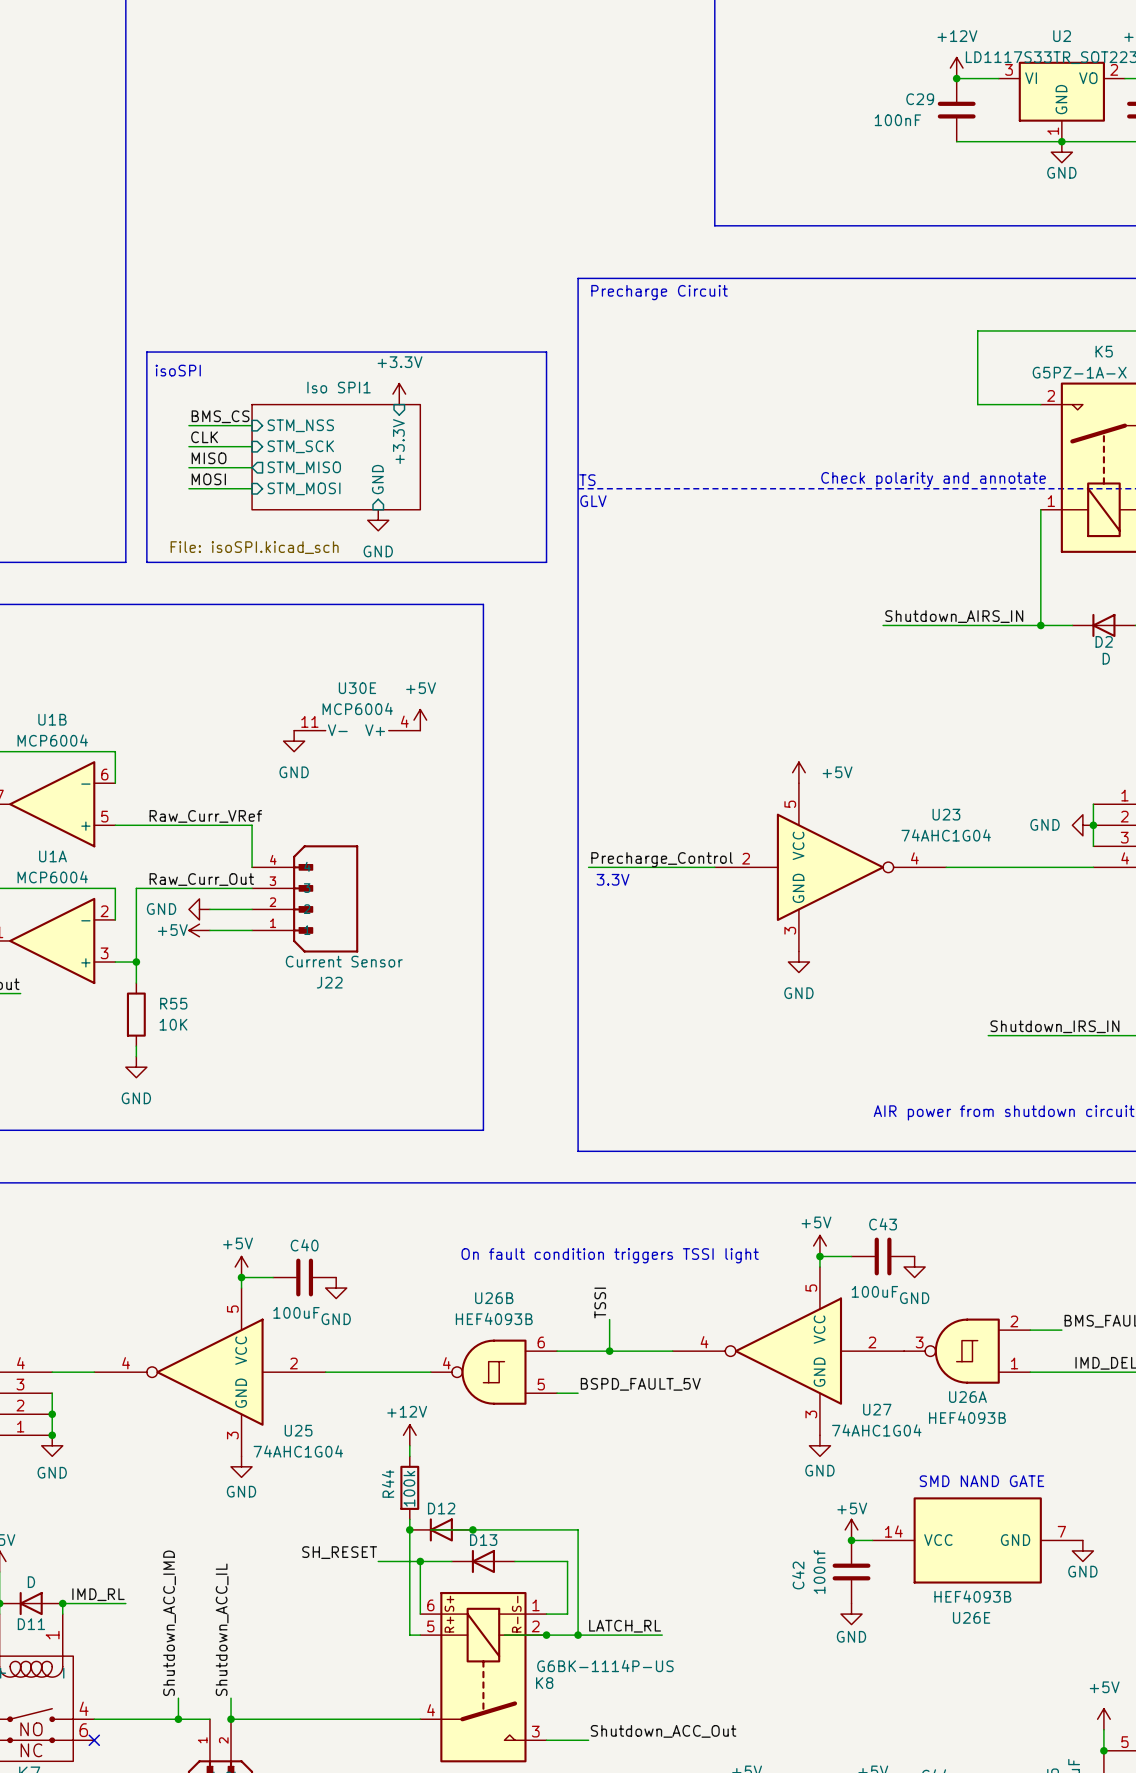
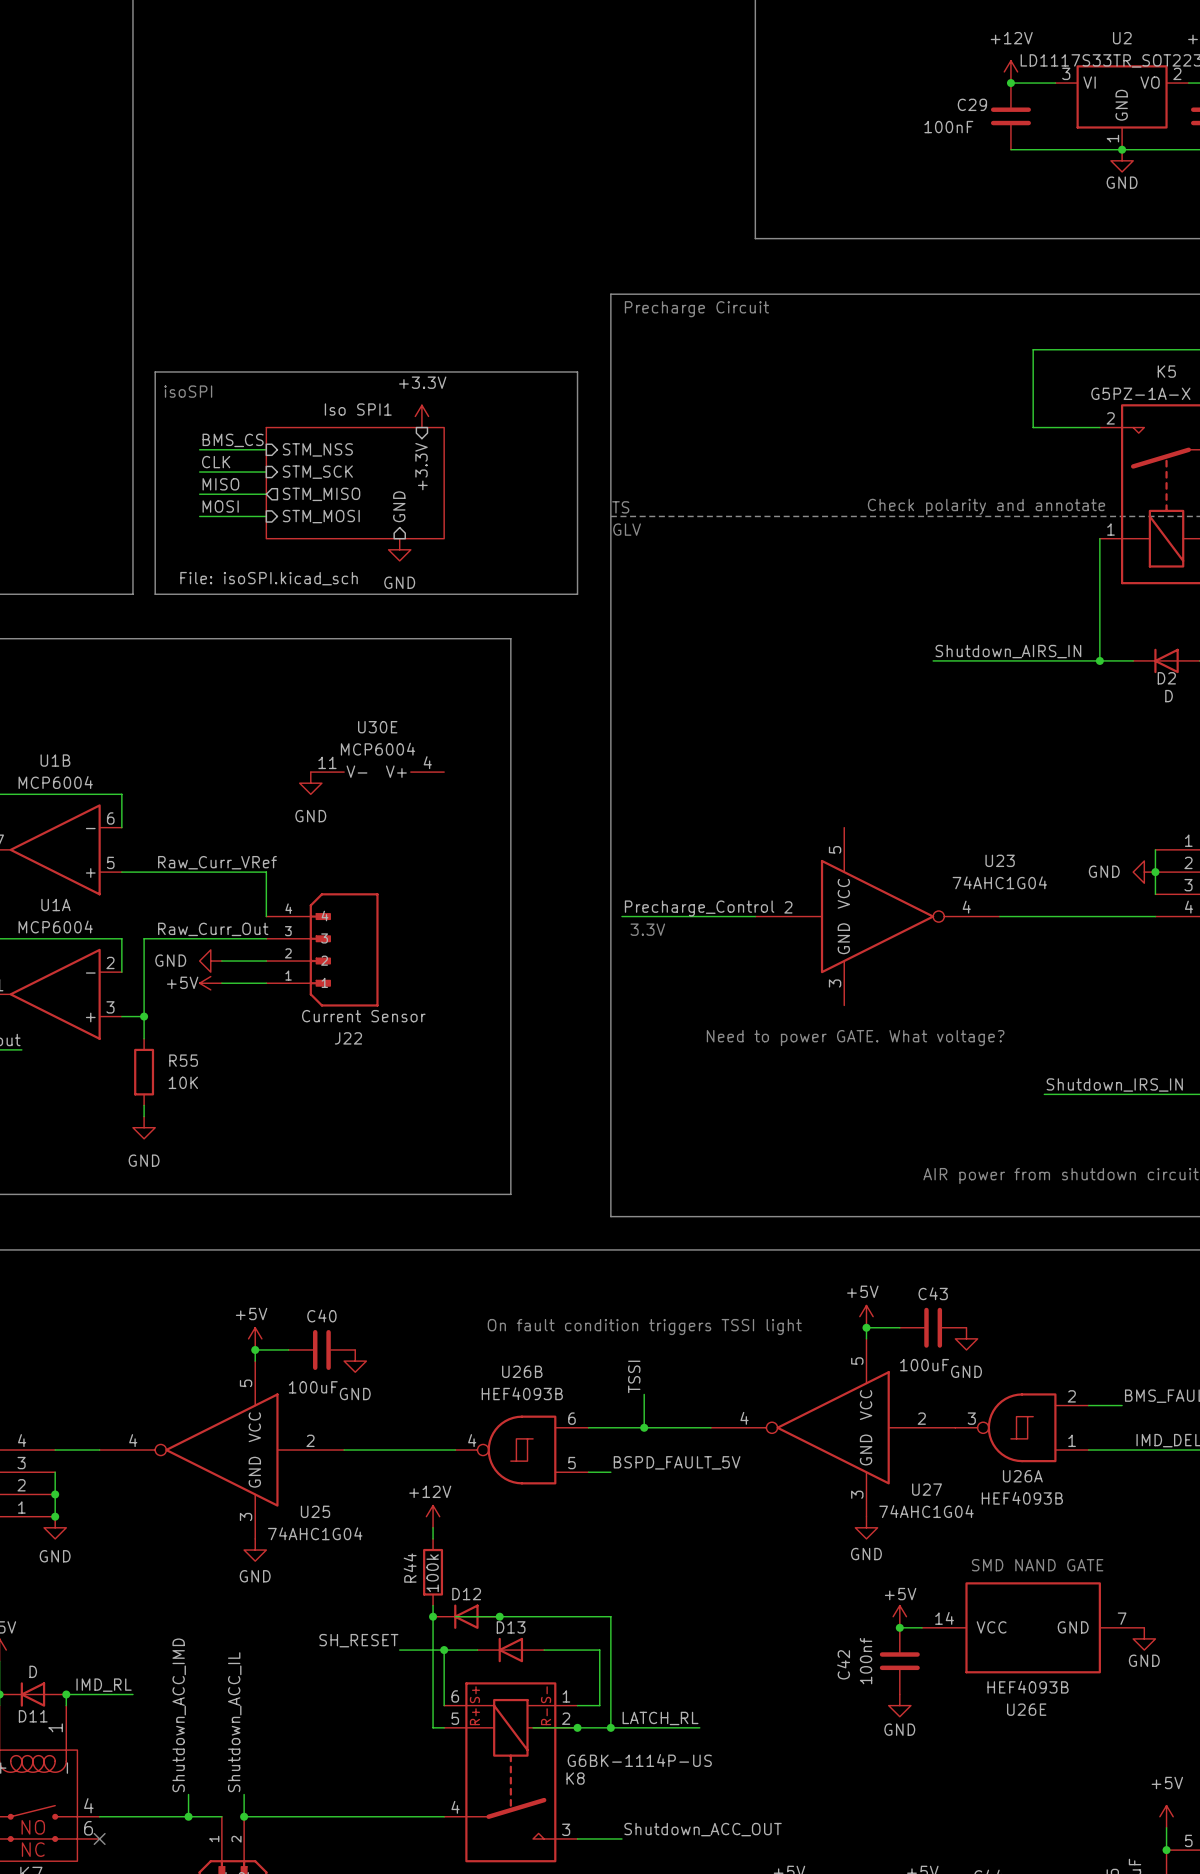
power symbol: +5V (420, 720) -> none
power symbol: +5V (798, 772) -> none
power symbol: GND (798, 962) -> none
text: none -> Need to power GATE. What voltage? (855, 1038)
label: Shutdown_ACC_Out (663, 1731) -> Shutdown_ACC_OUT (703, 1829)

